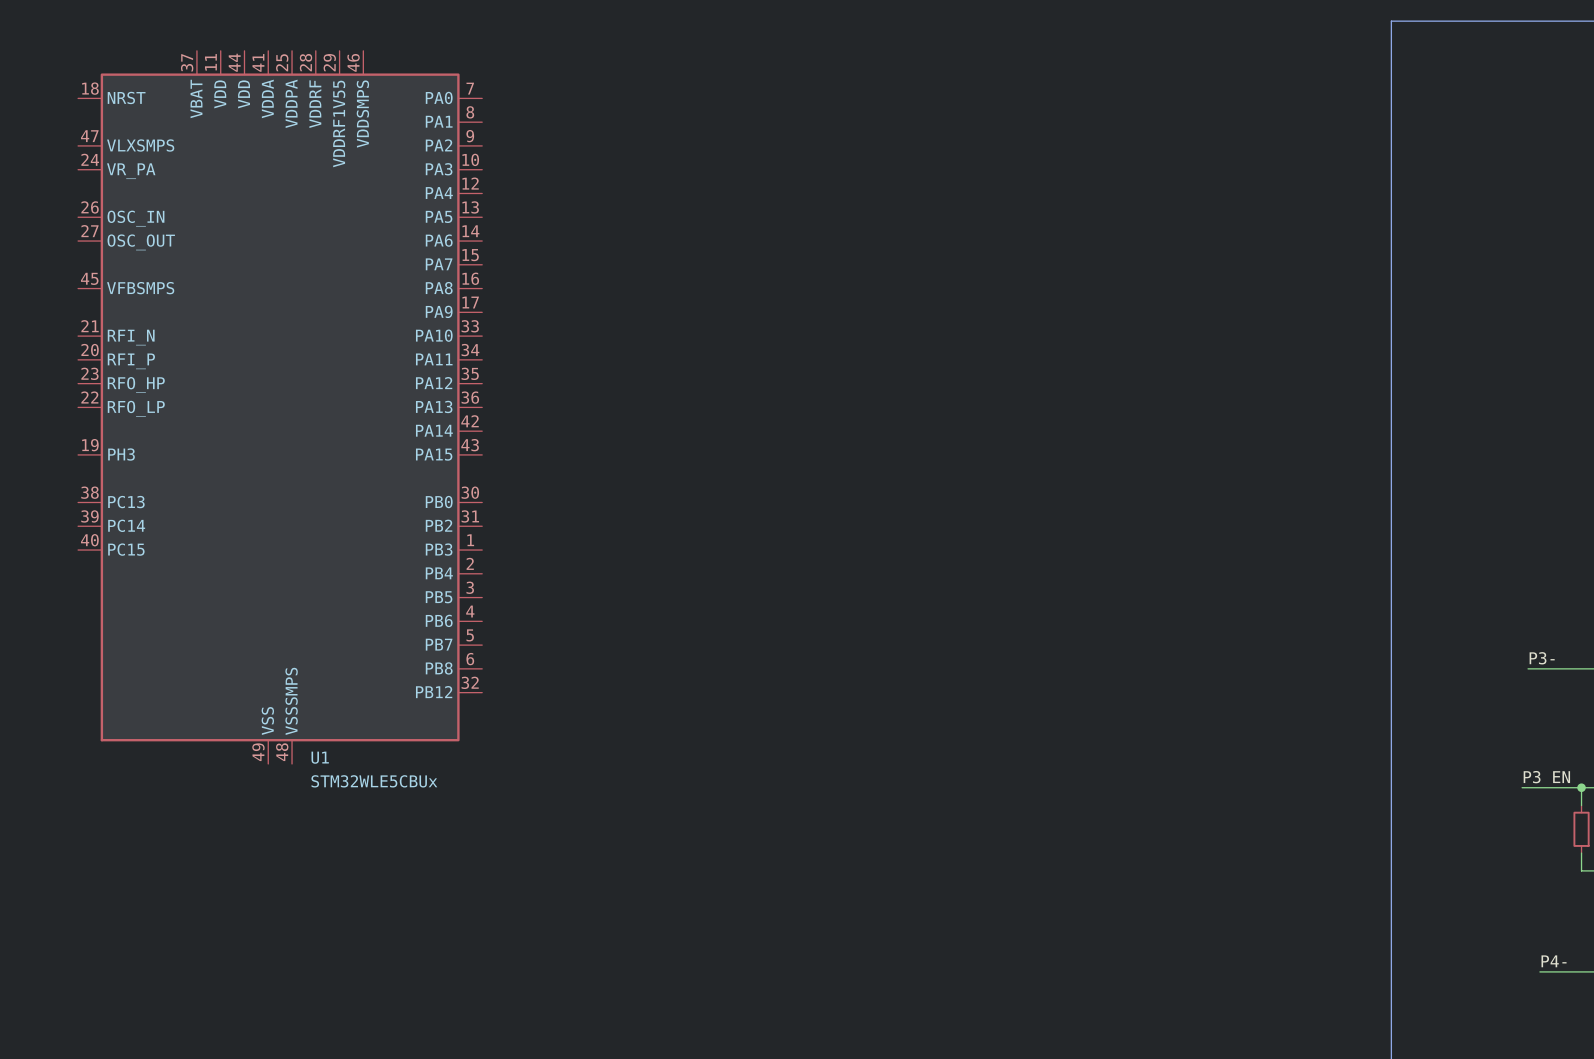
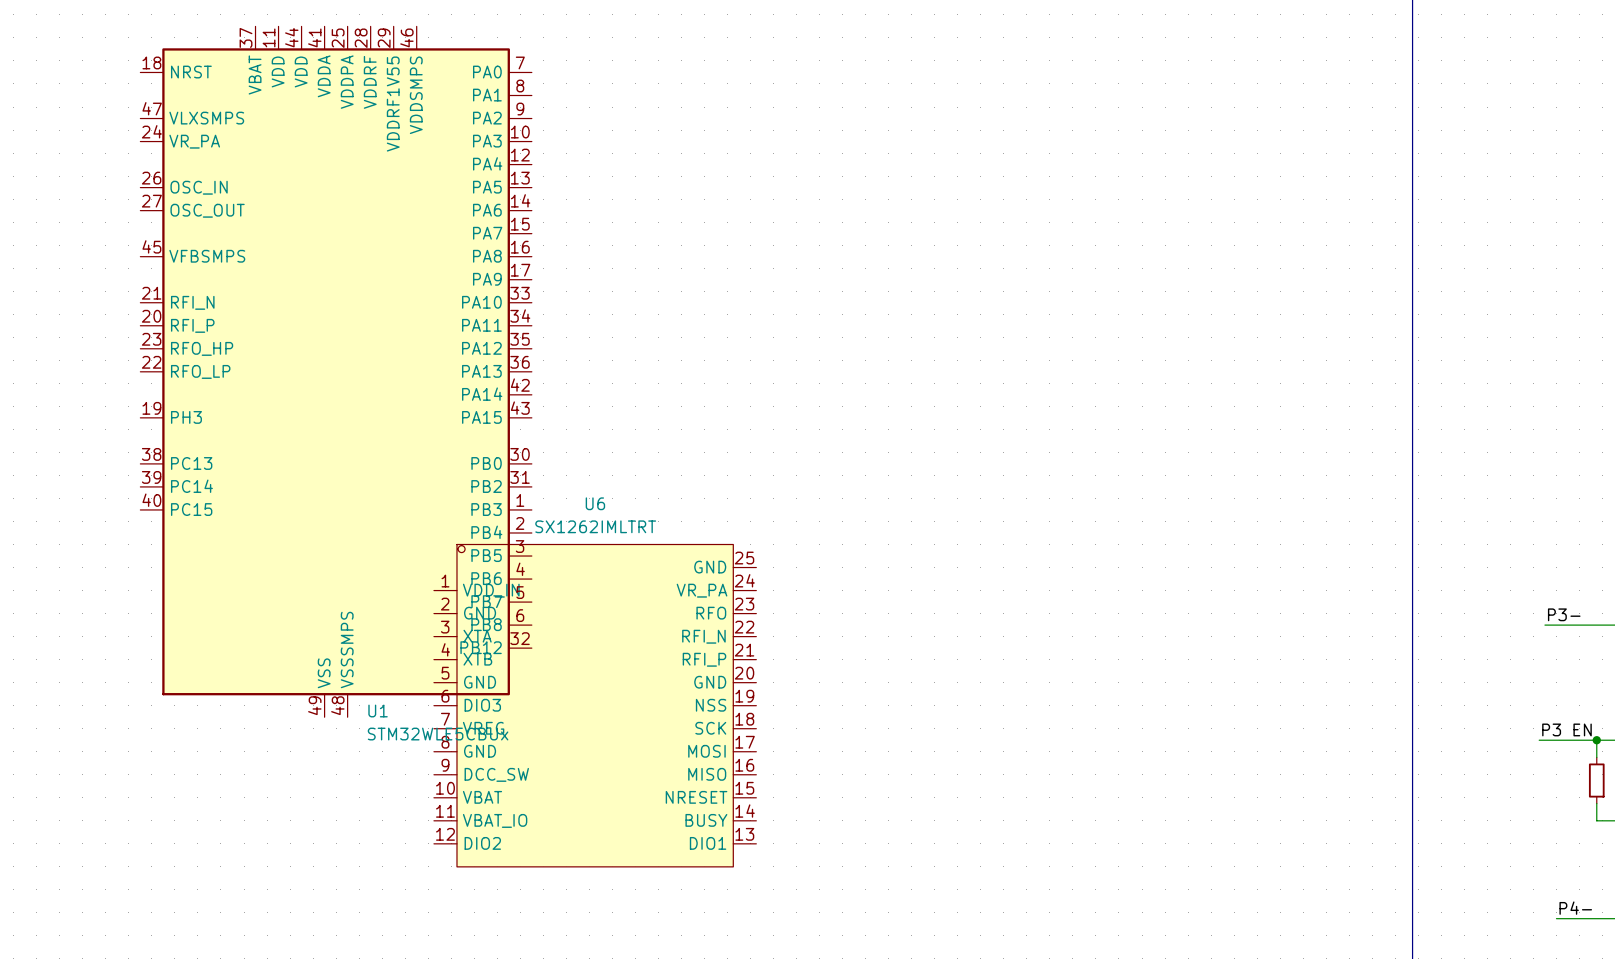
U6: none -> SX1262IMLTRT (595, 705)

